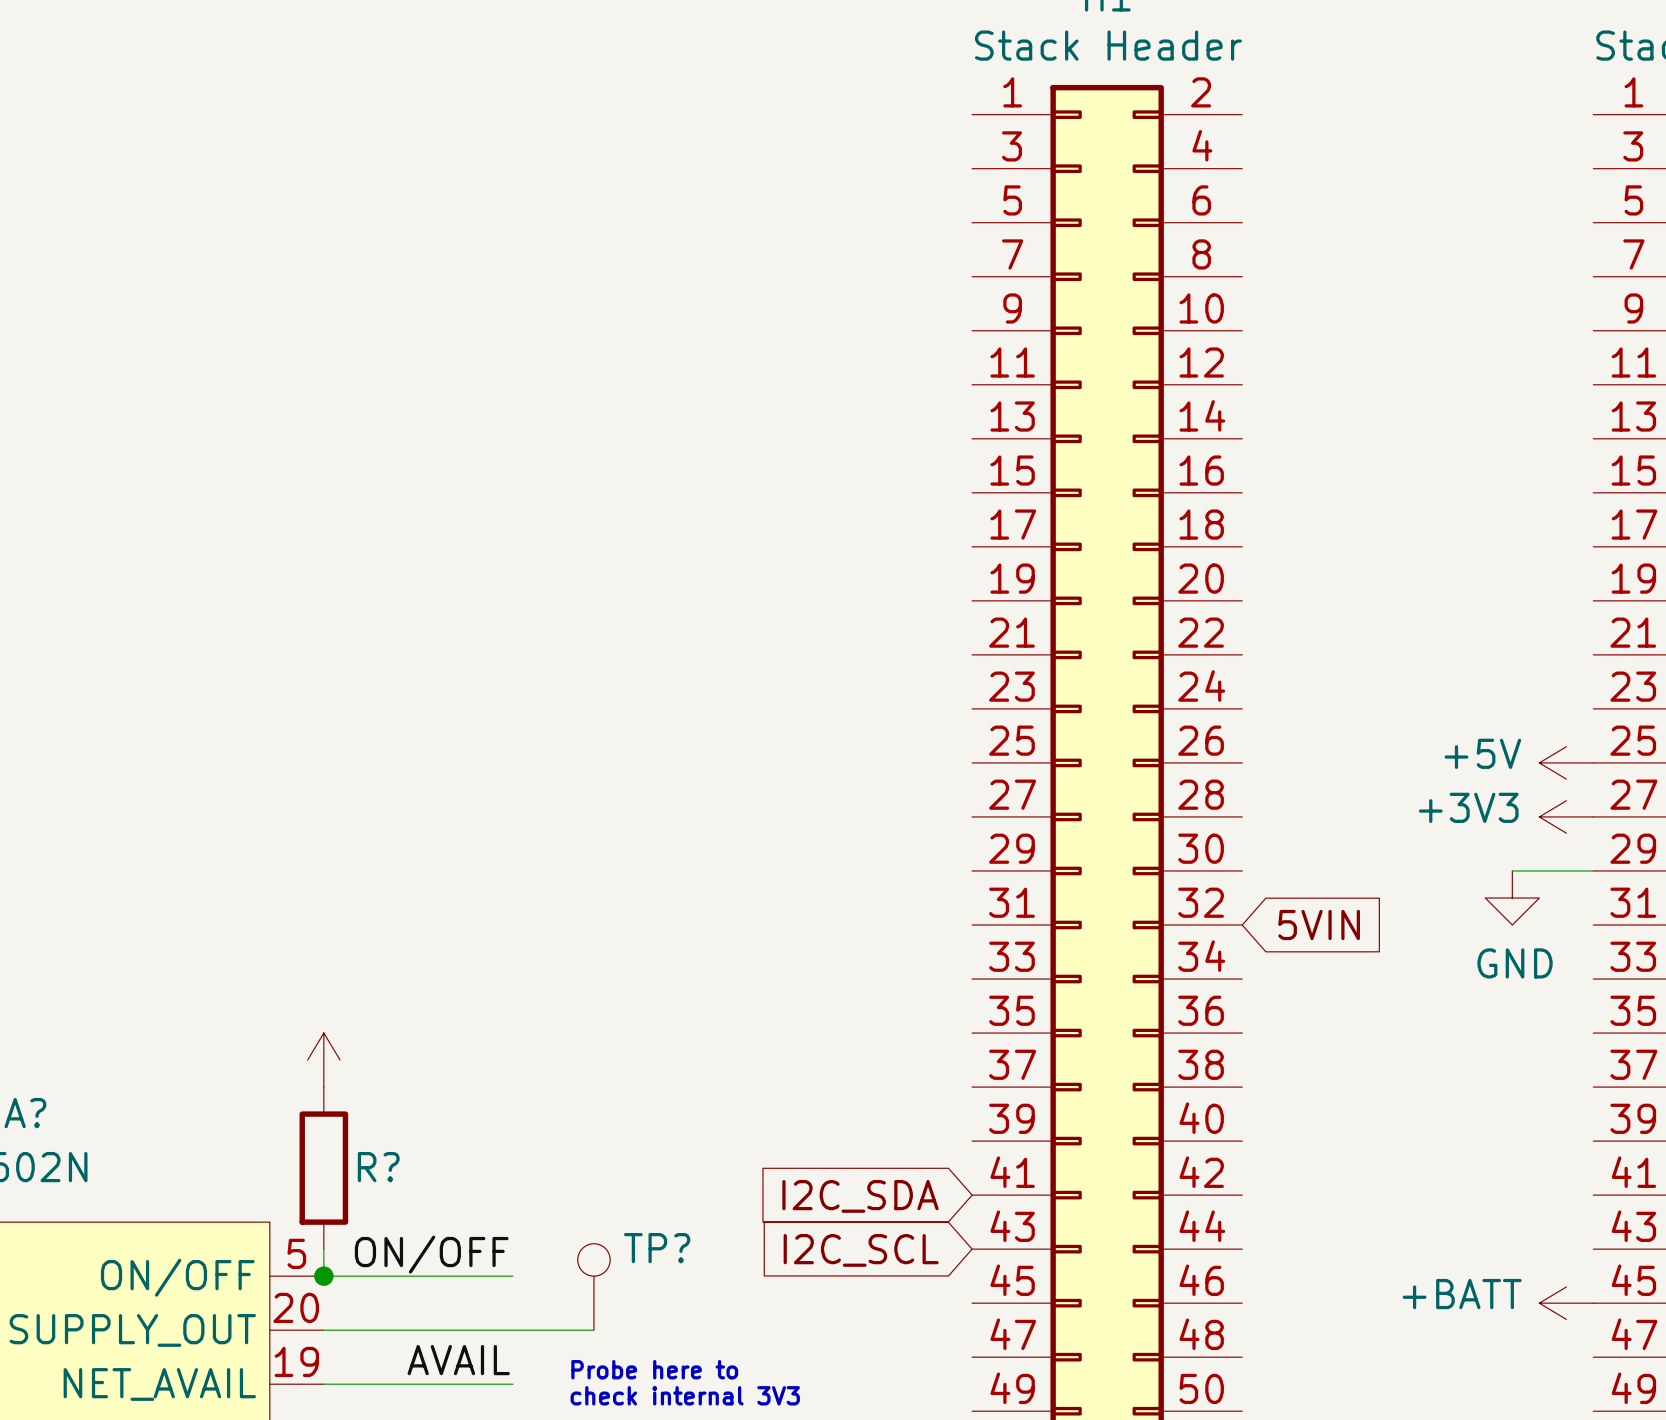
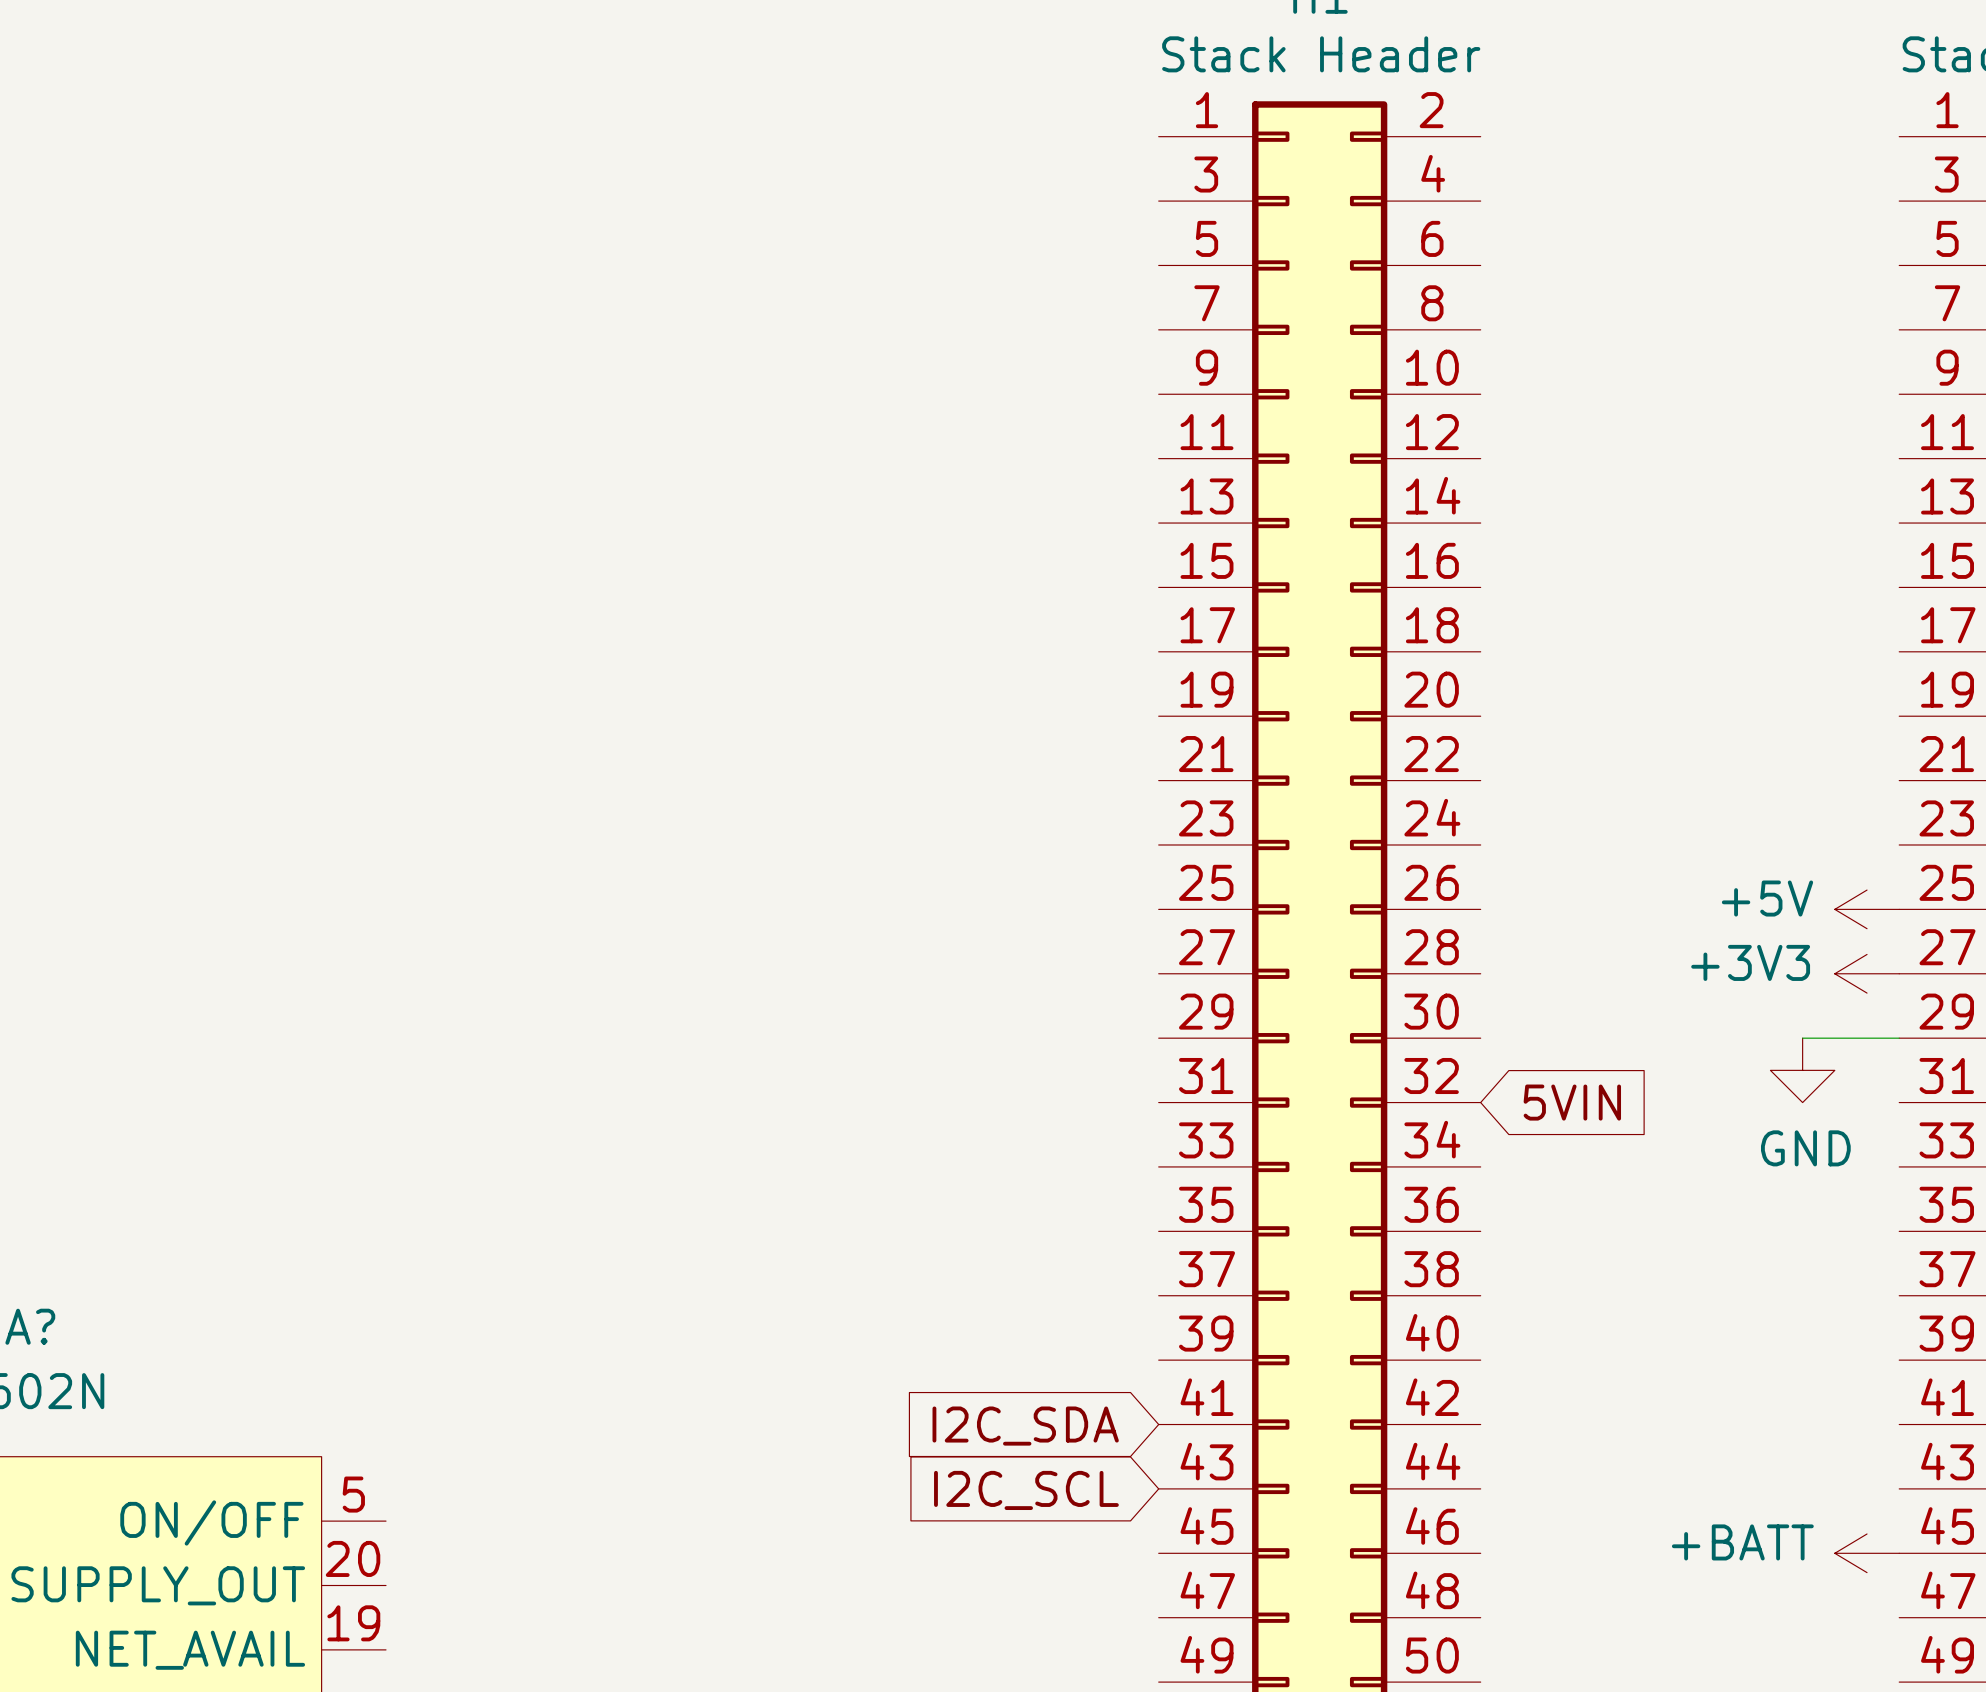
power symbol: (323, 1060) -> none
R?: (323, 1168) -> none
wire: (323, 1249) (323, 1276) (512, 1276) -> none
label: ON/OFF (431, 1254) -> none
junction: (323, 1276) -> none
TP?: (593, 1286) -> none
wire: (323, 1330) (593, 1330) -> none
label: AVAIL (458, 1360) -> none
text: Probe here to (654, 1369) -> none
wire: (323, 1384) (512, 1384) -> none
text: check internal 3V3 (685, 1395) -> none

